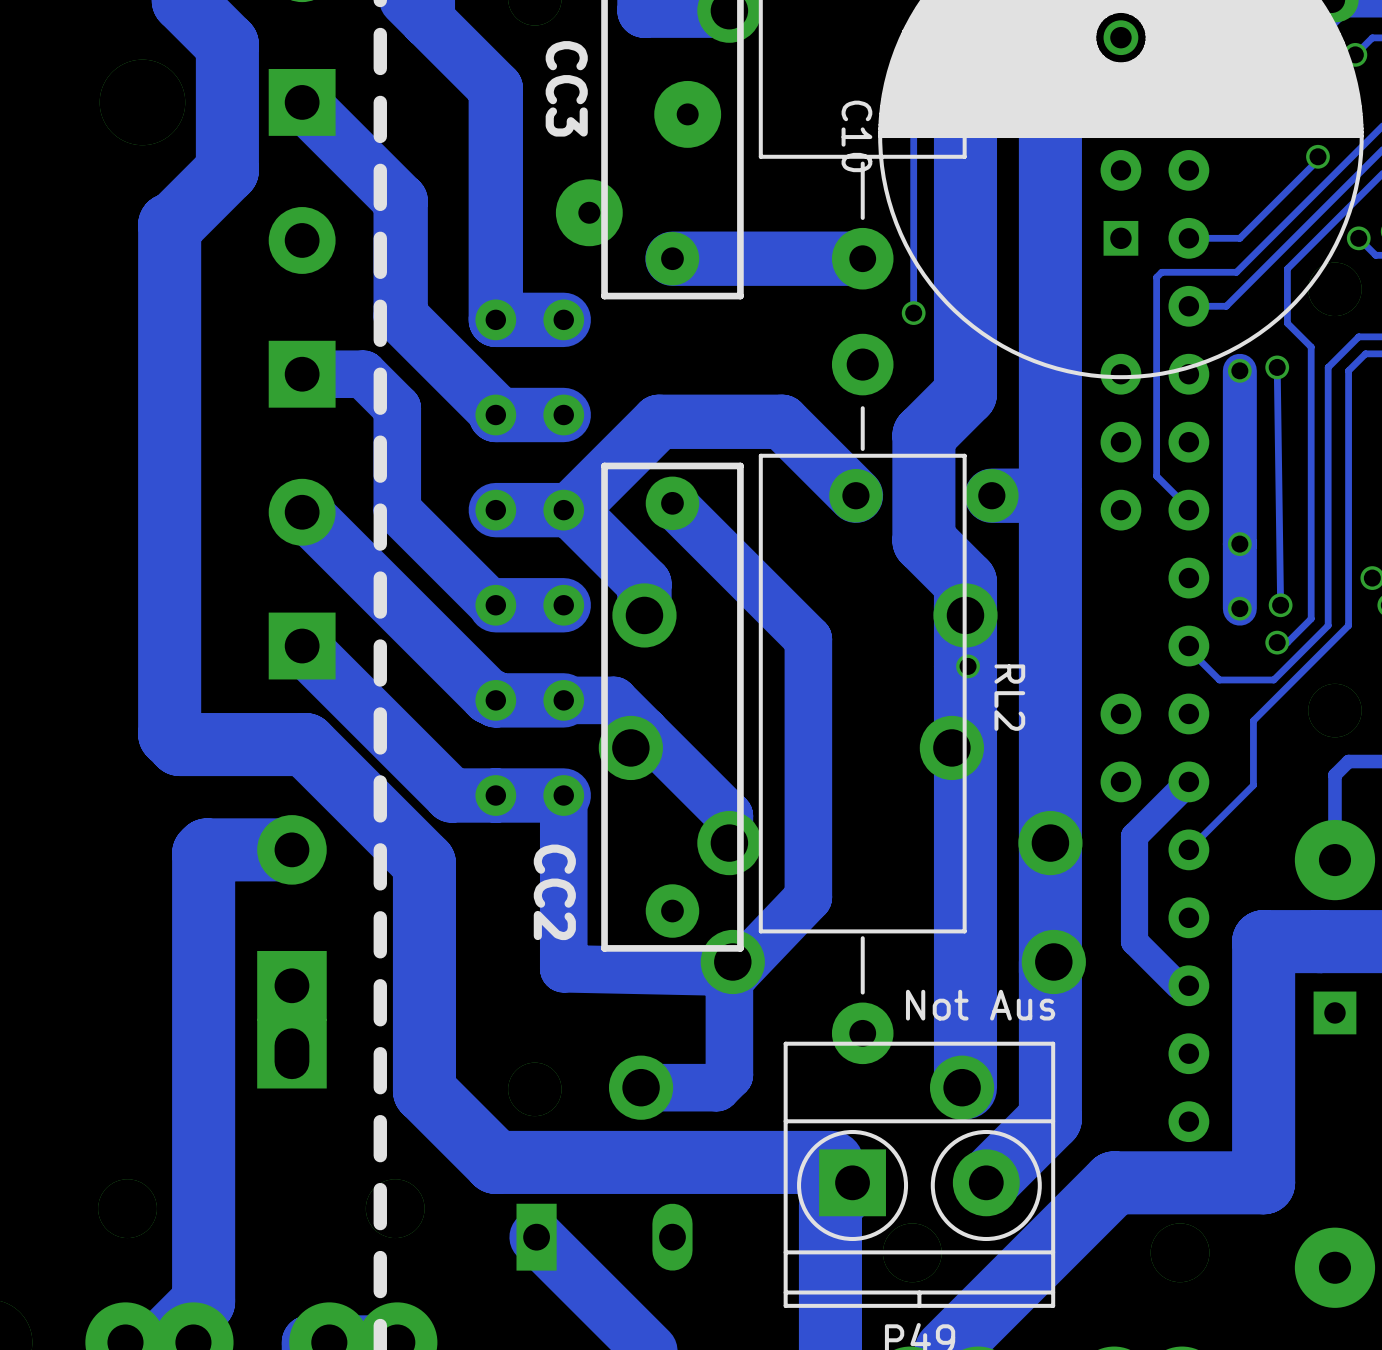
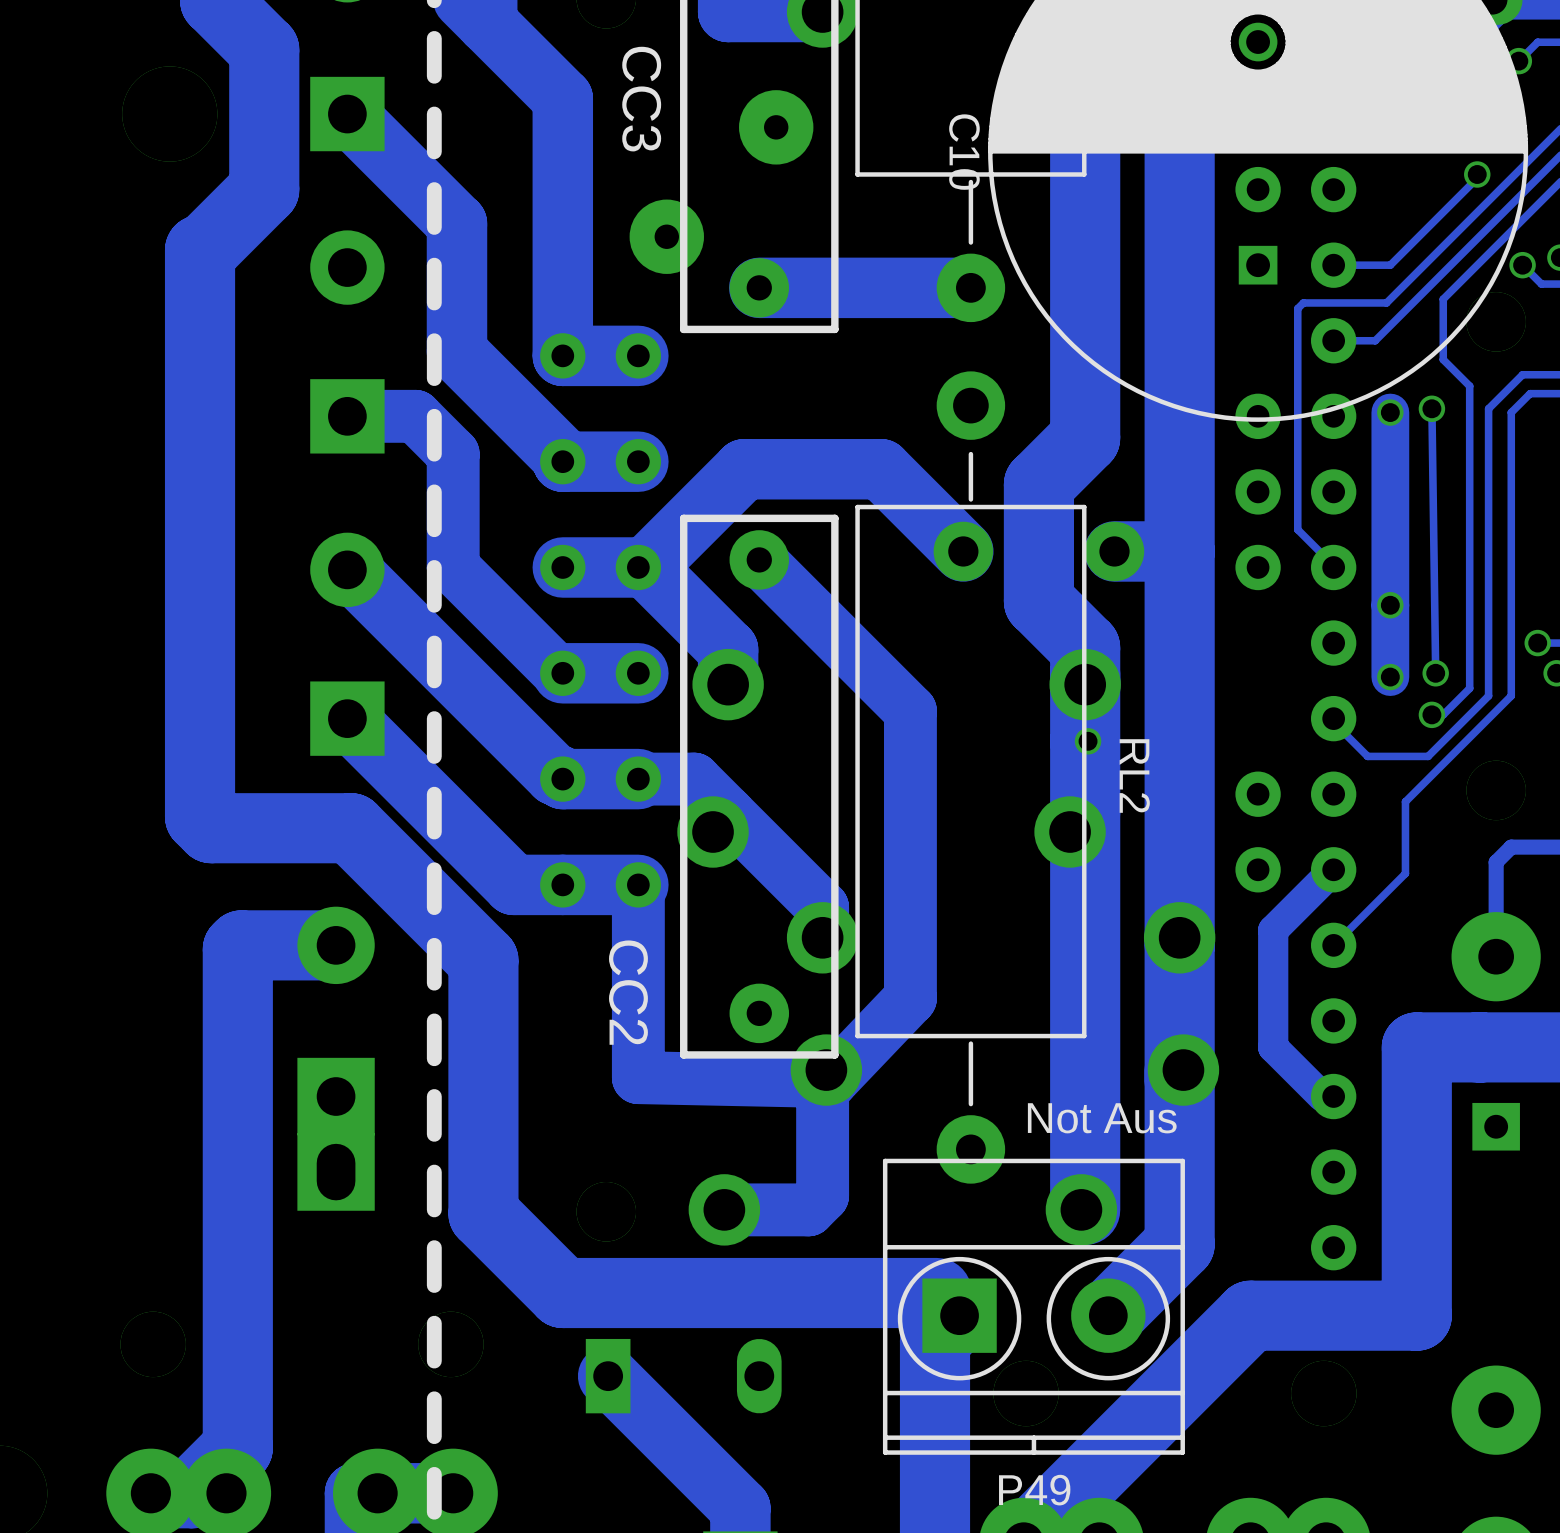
track: (913, 122) (913, 313) -> none
via: (913, 313) -> none

